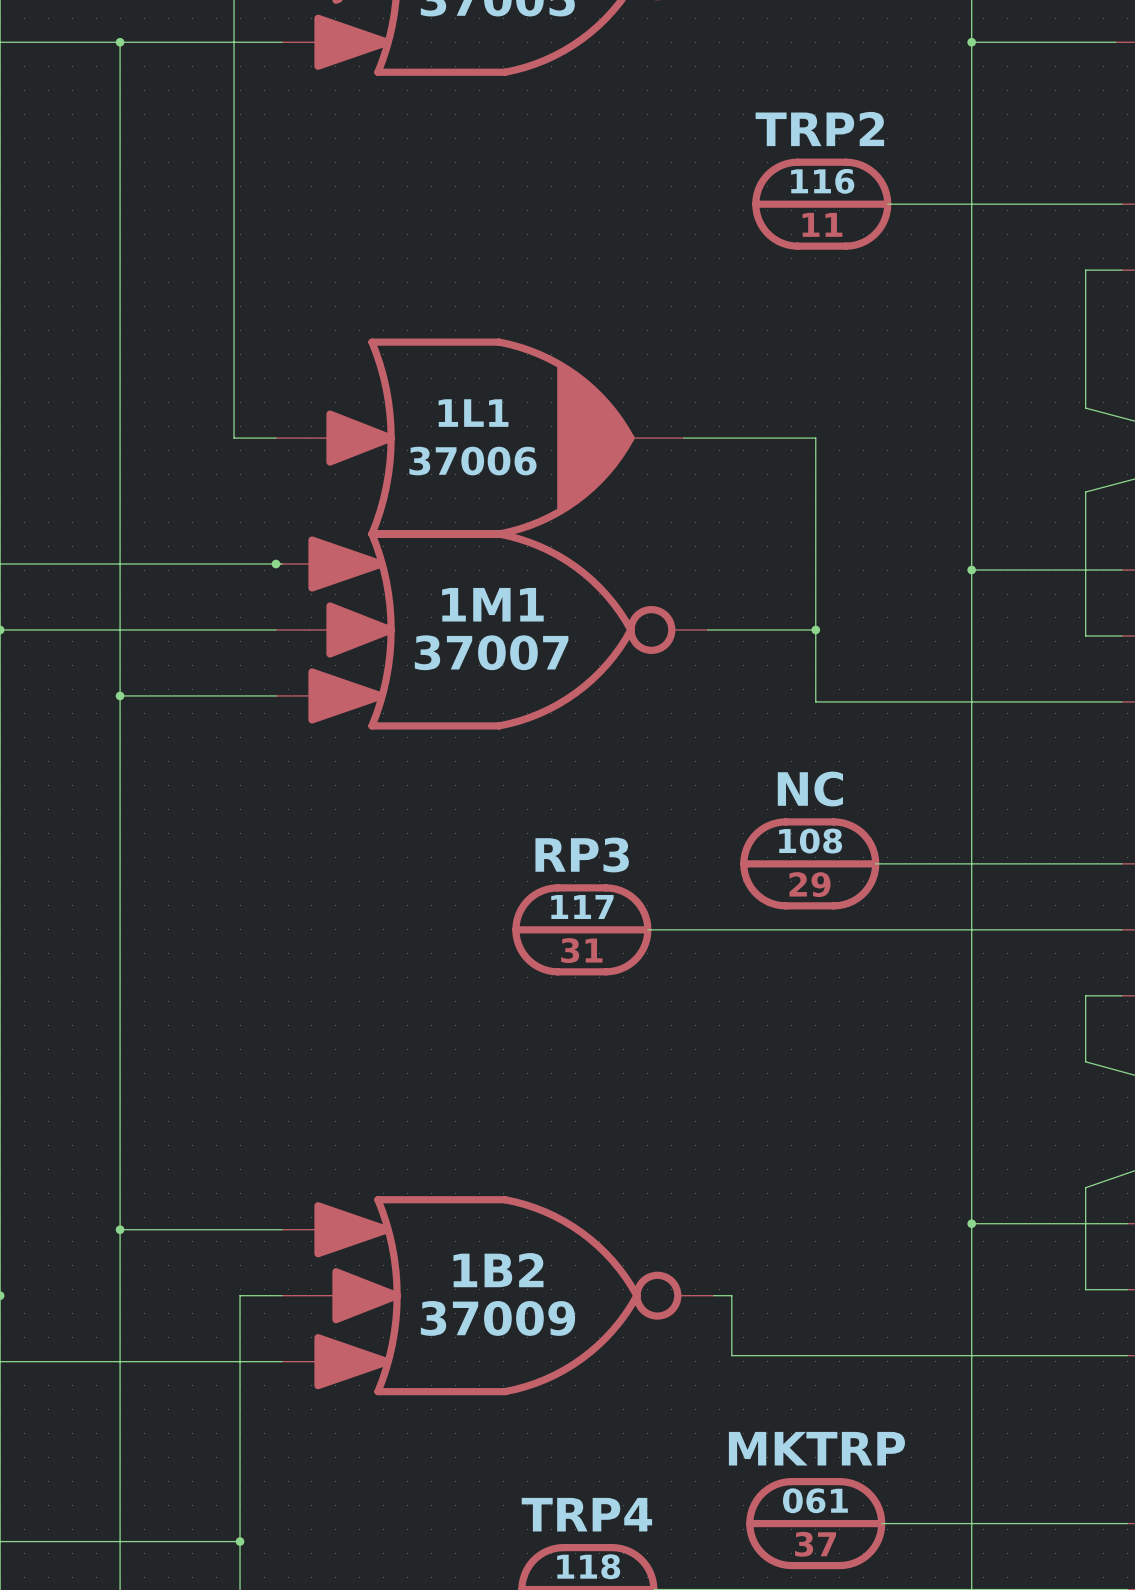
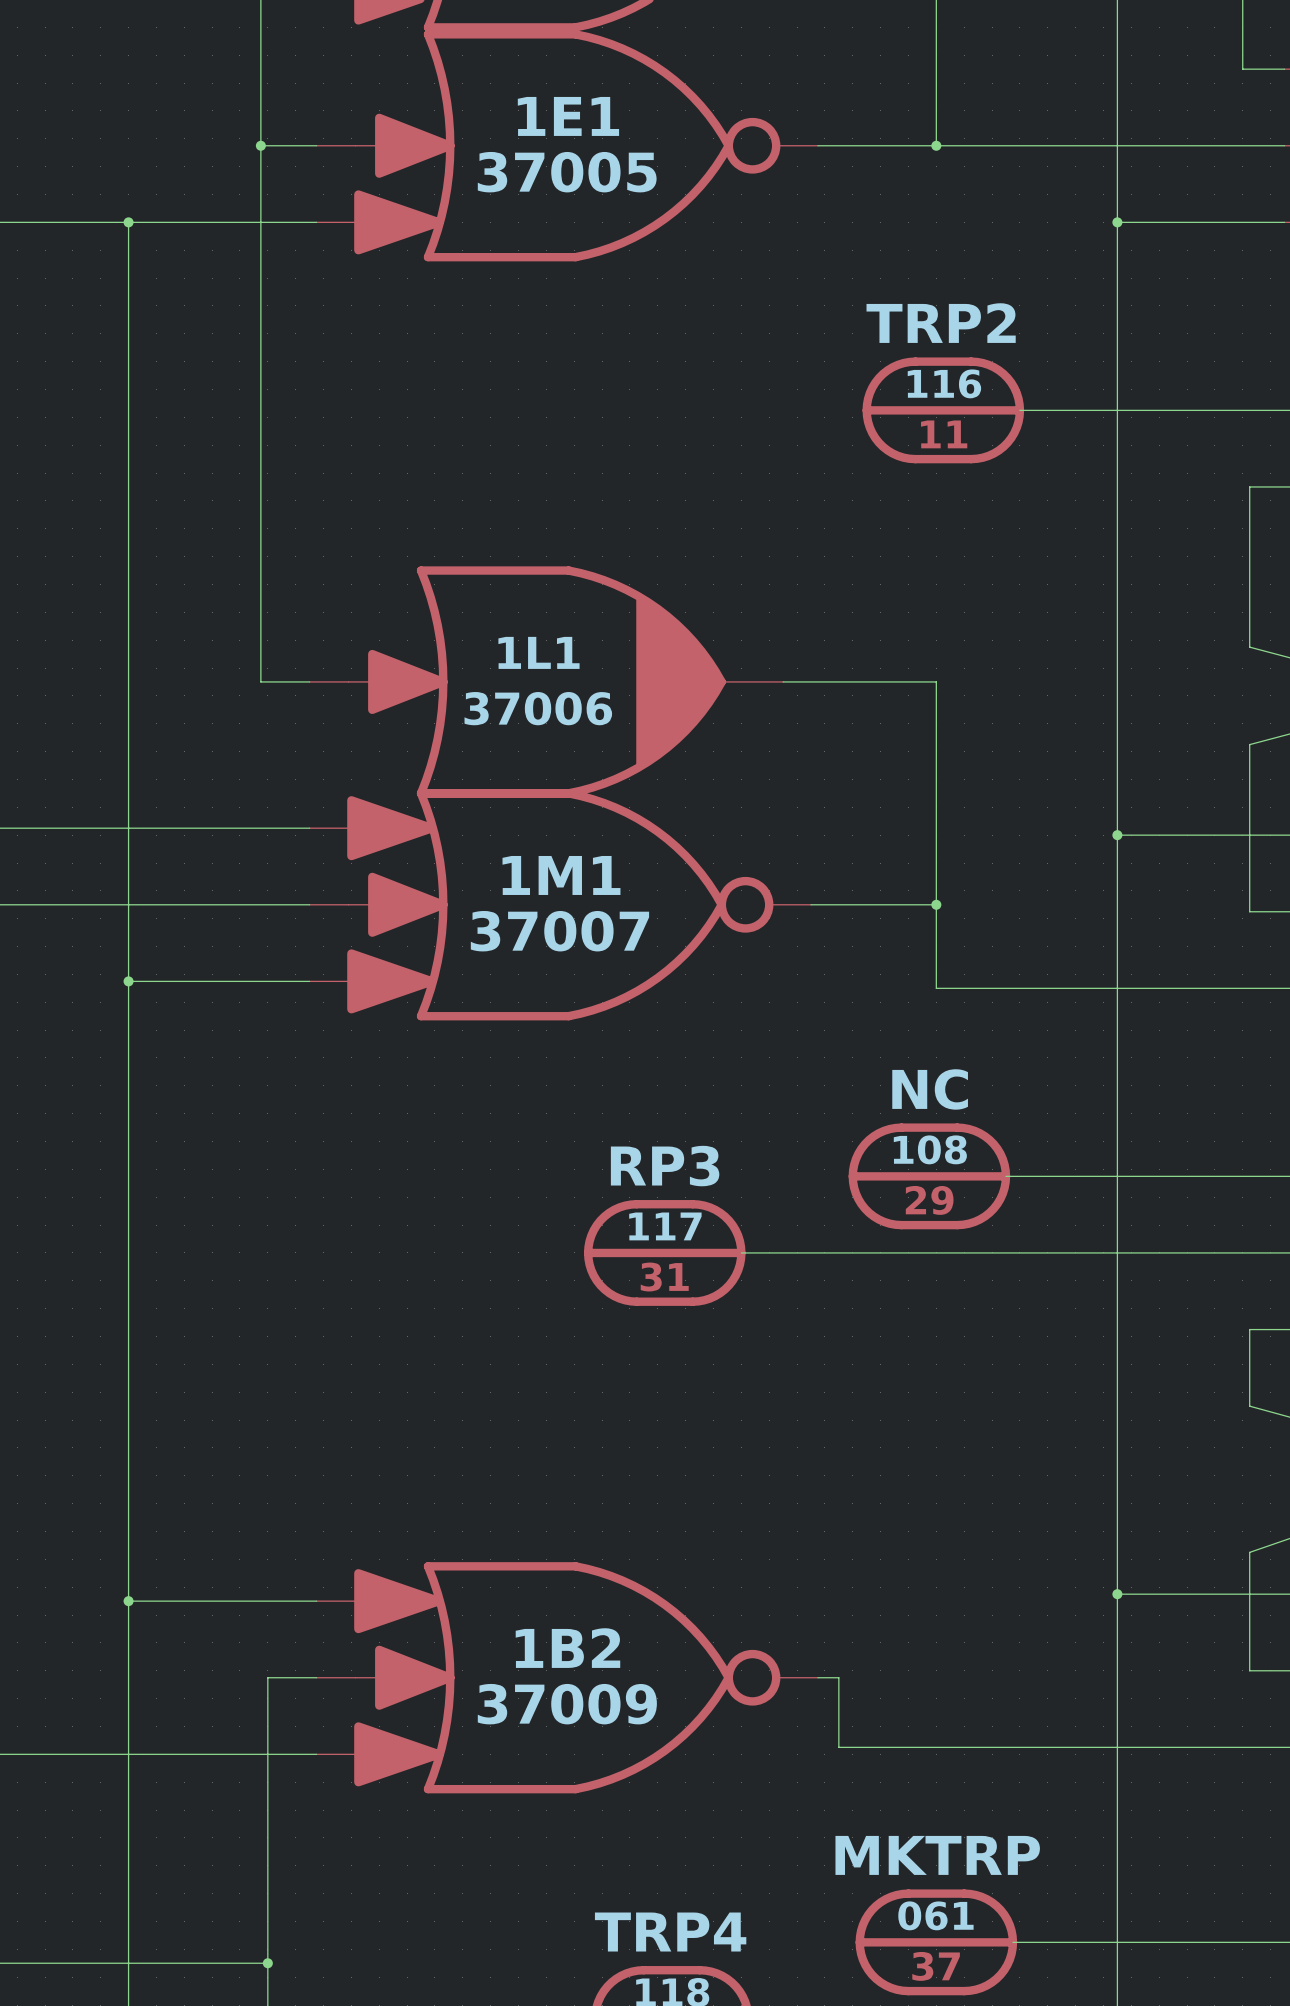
junction: (276, 564) -> none

